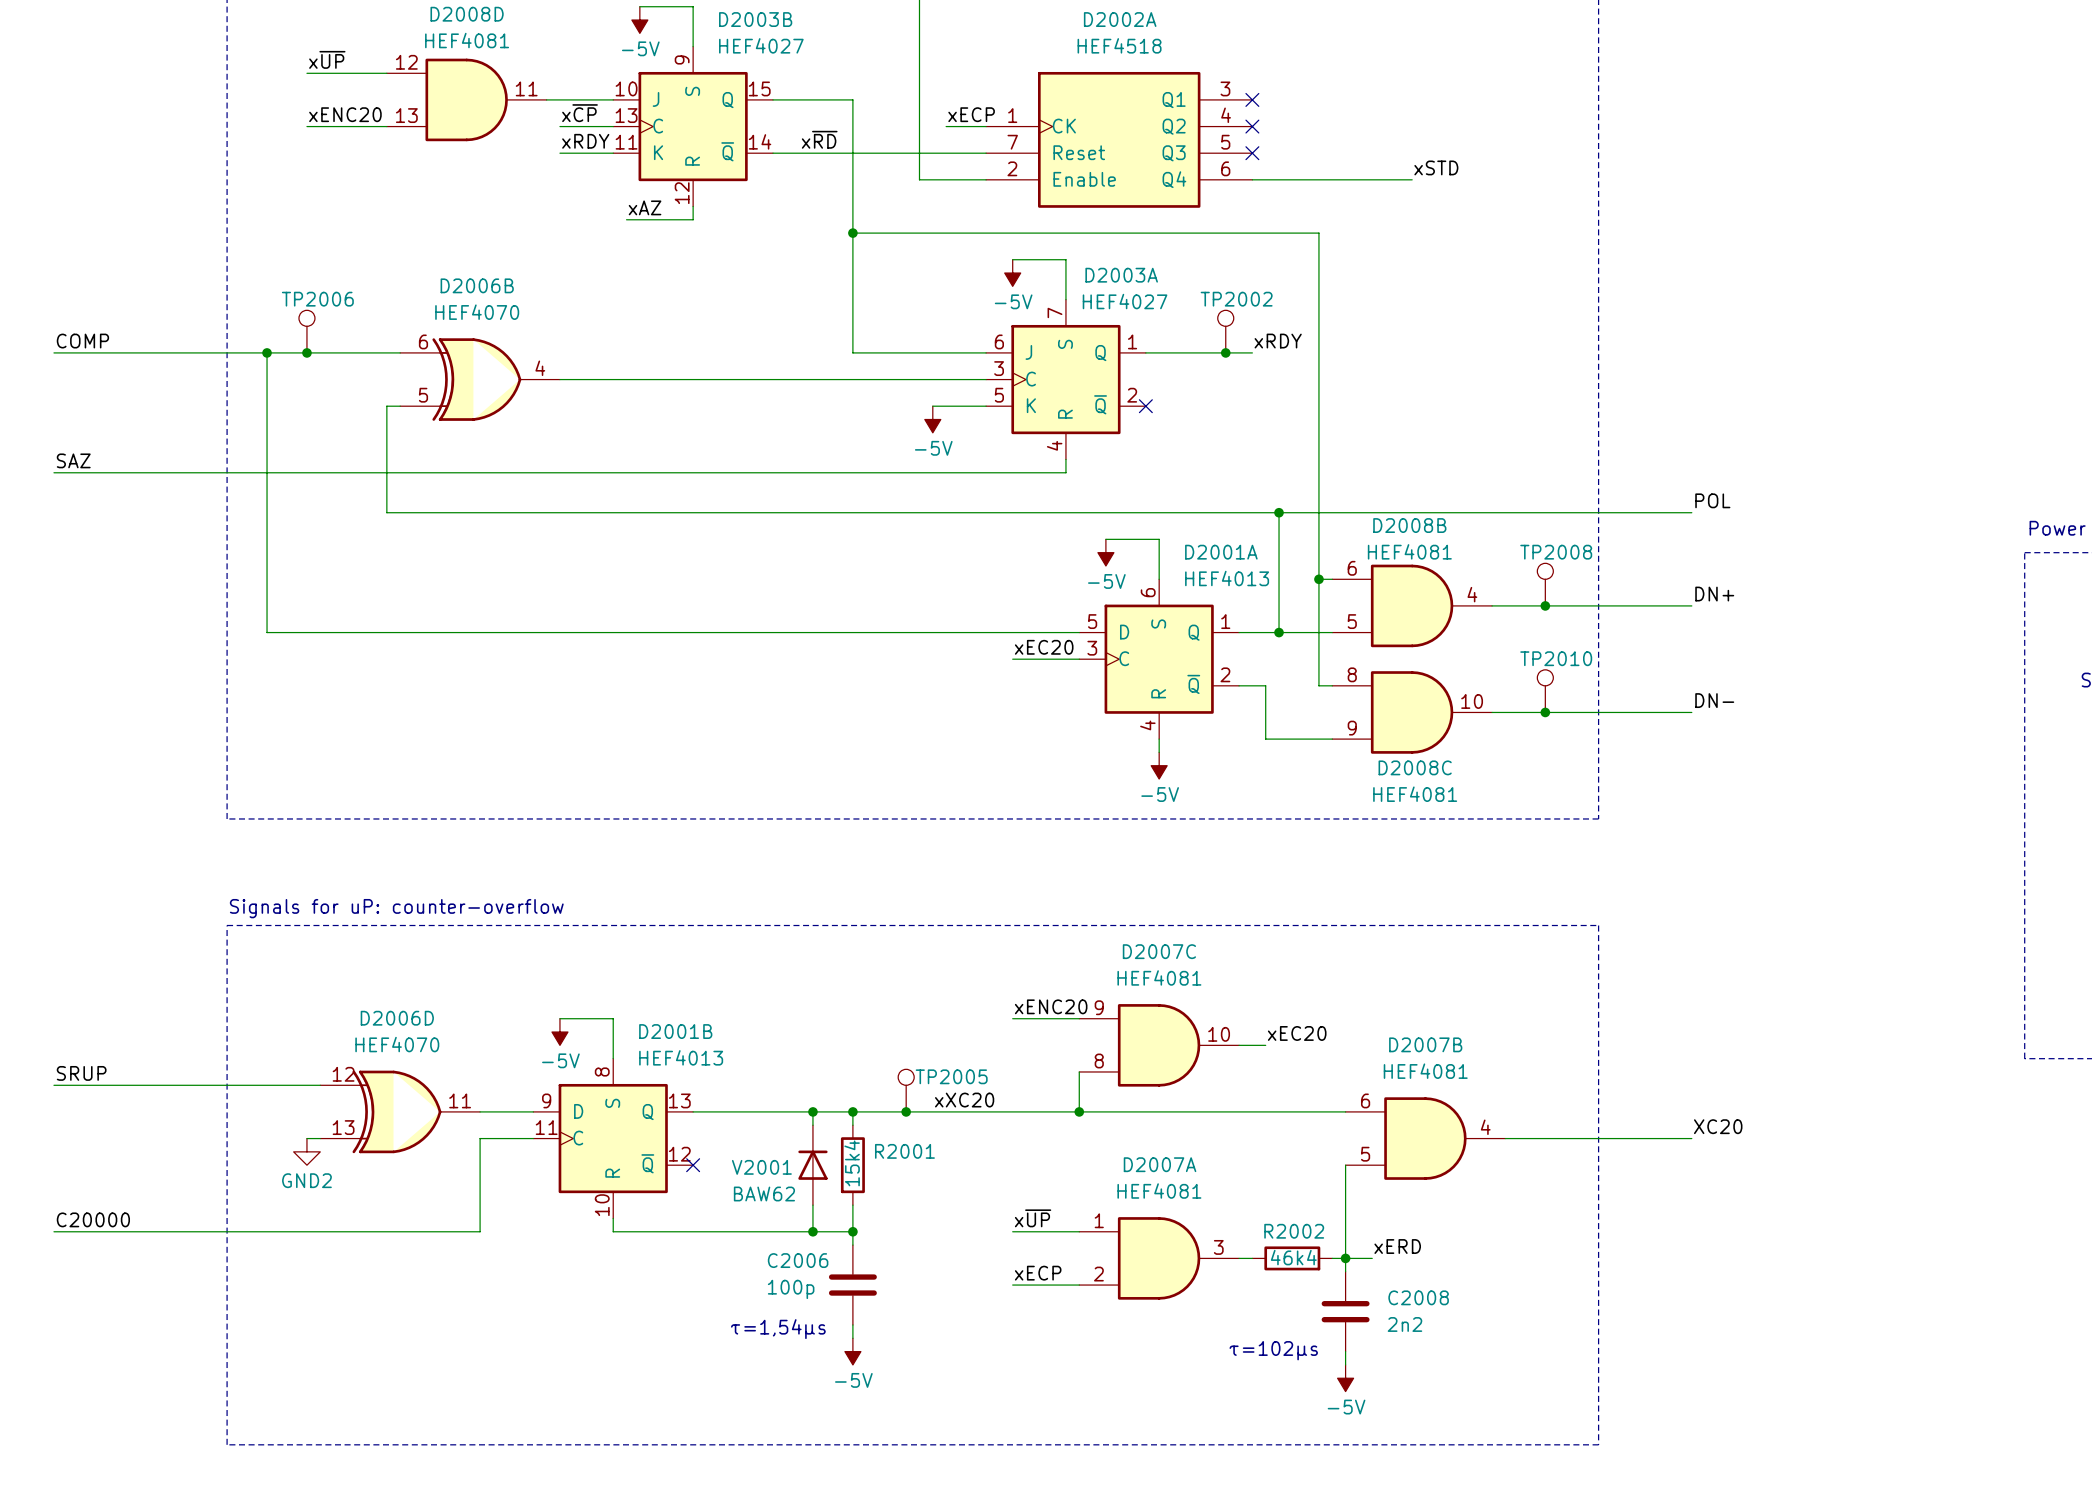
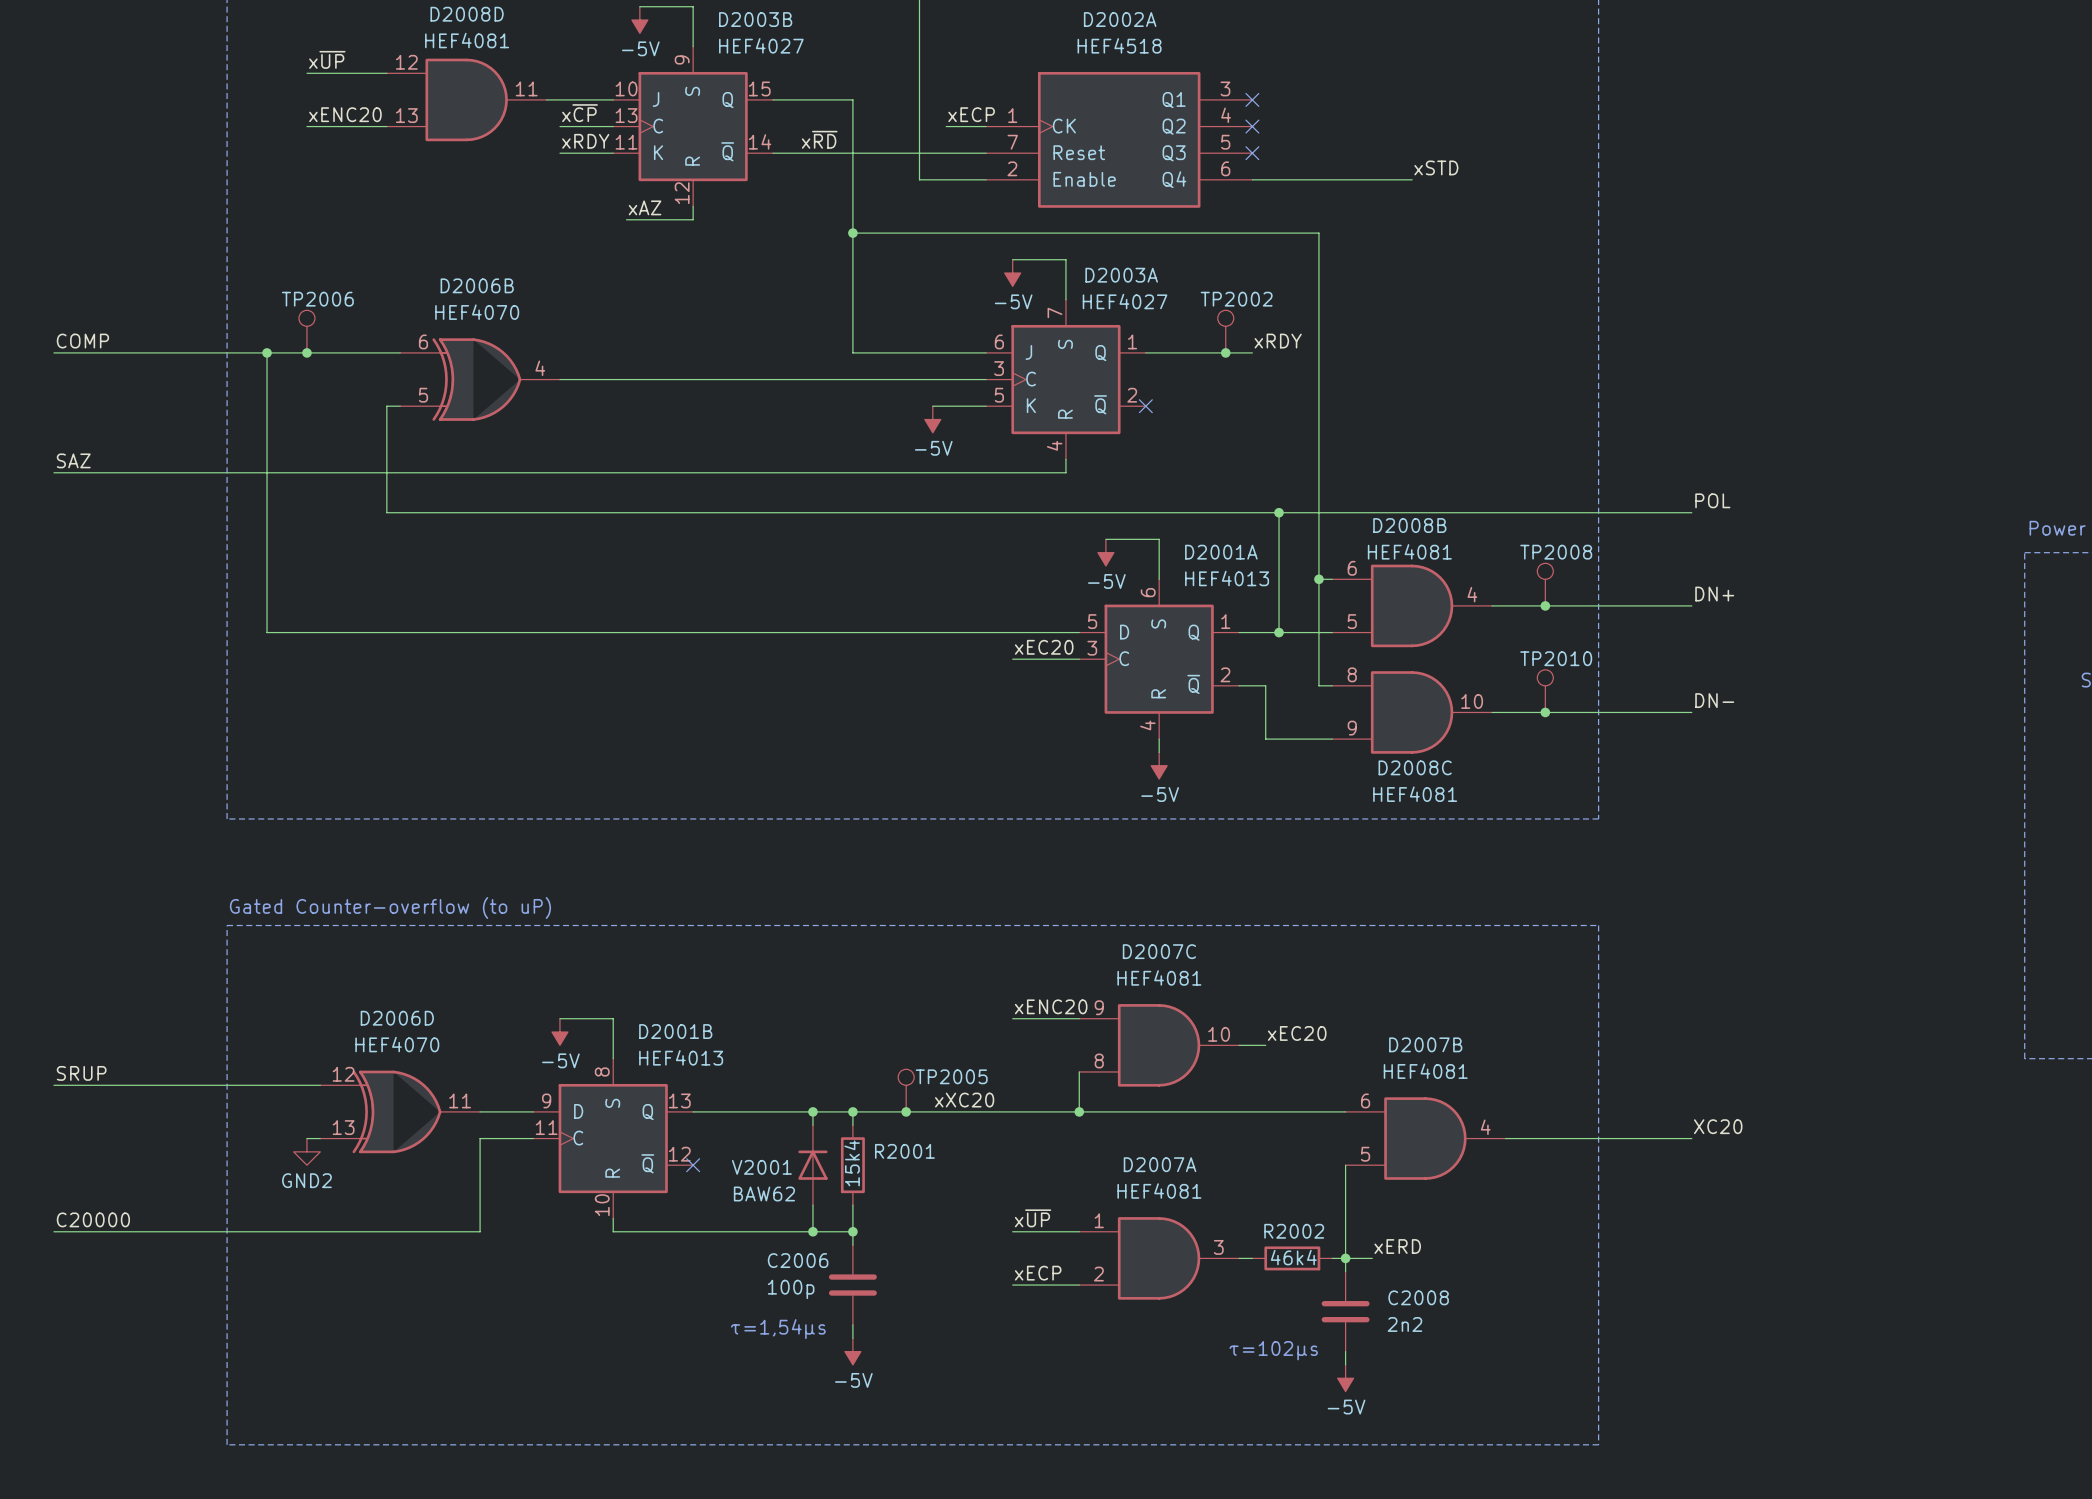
text: Signals for uP: counter-overflow (396, 908) -> Gated Counter-overflow (to uP) (390, 908)

